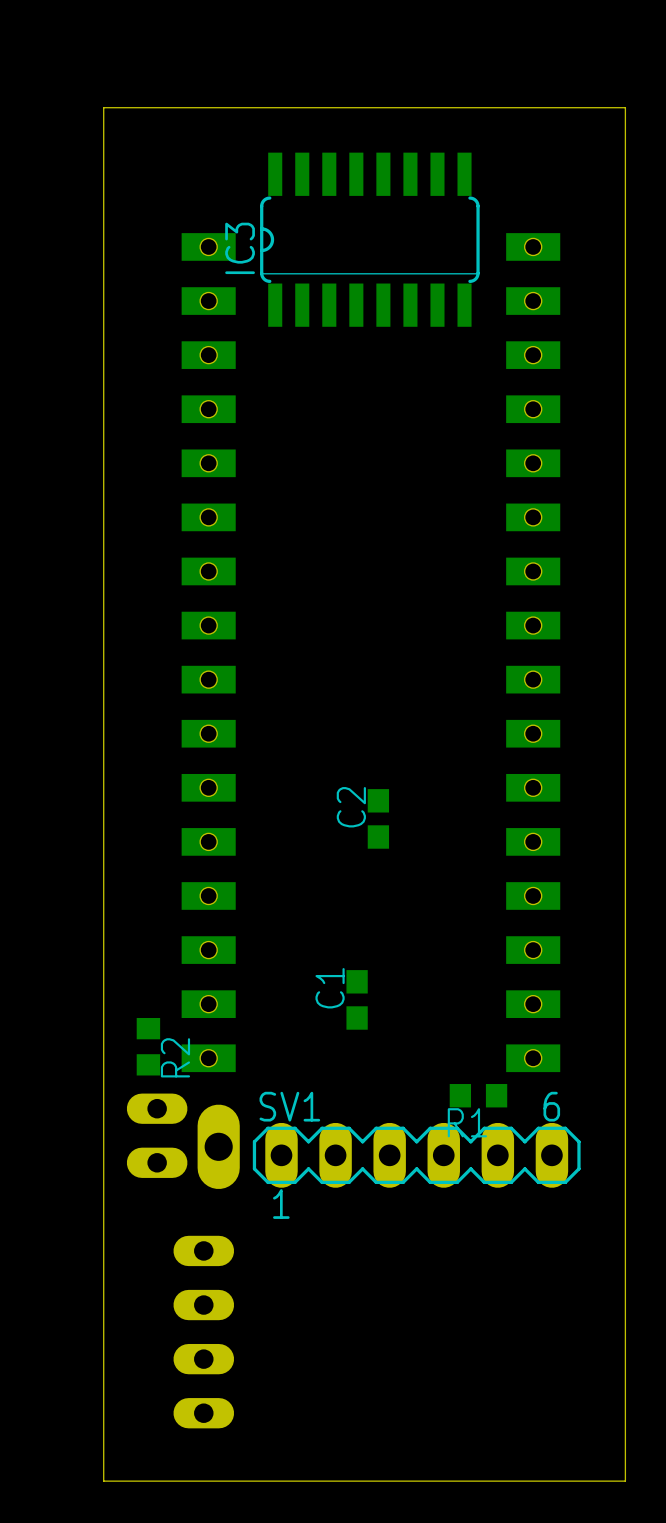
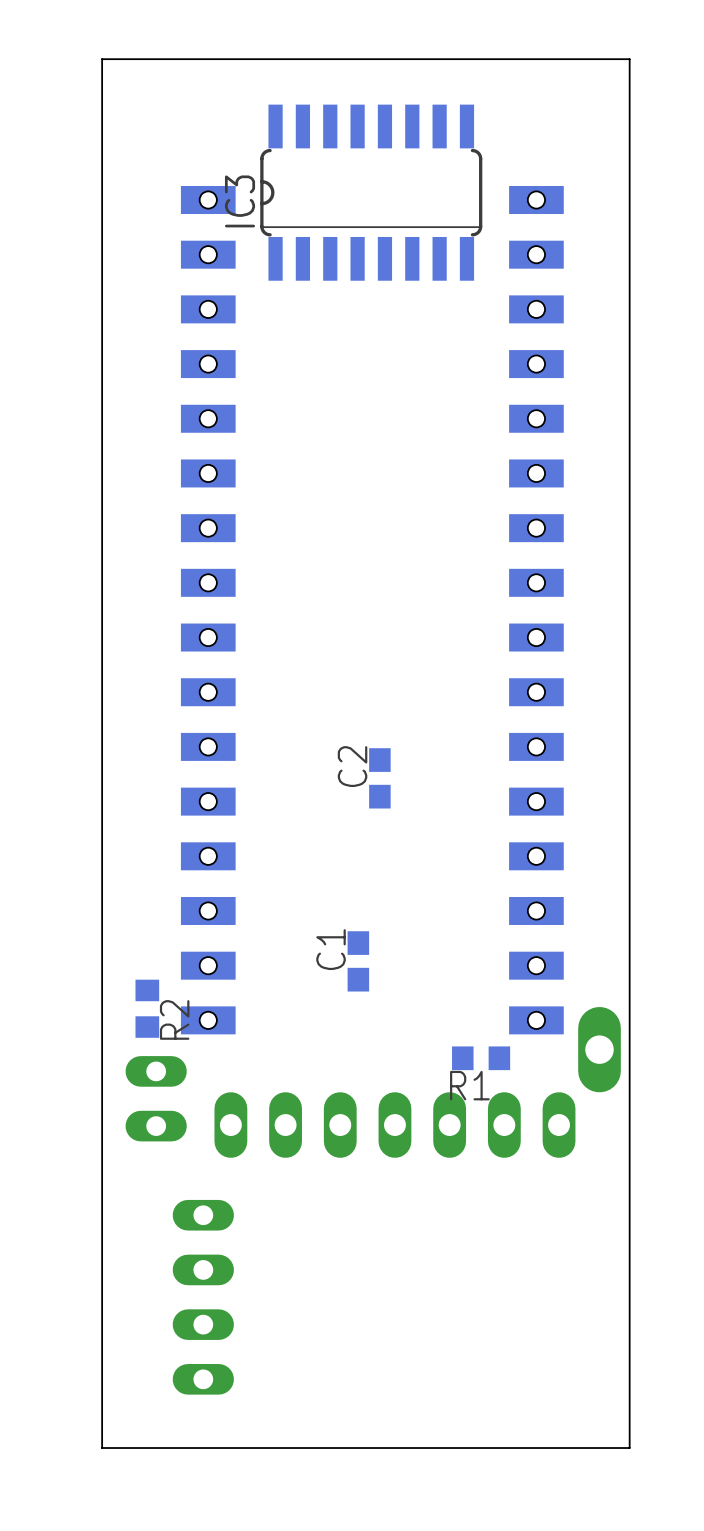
part position: (218, 1146) -> (599, 1049)
SV1: (416, 1155) -> none
part: none -> (394, 1125)

